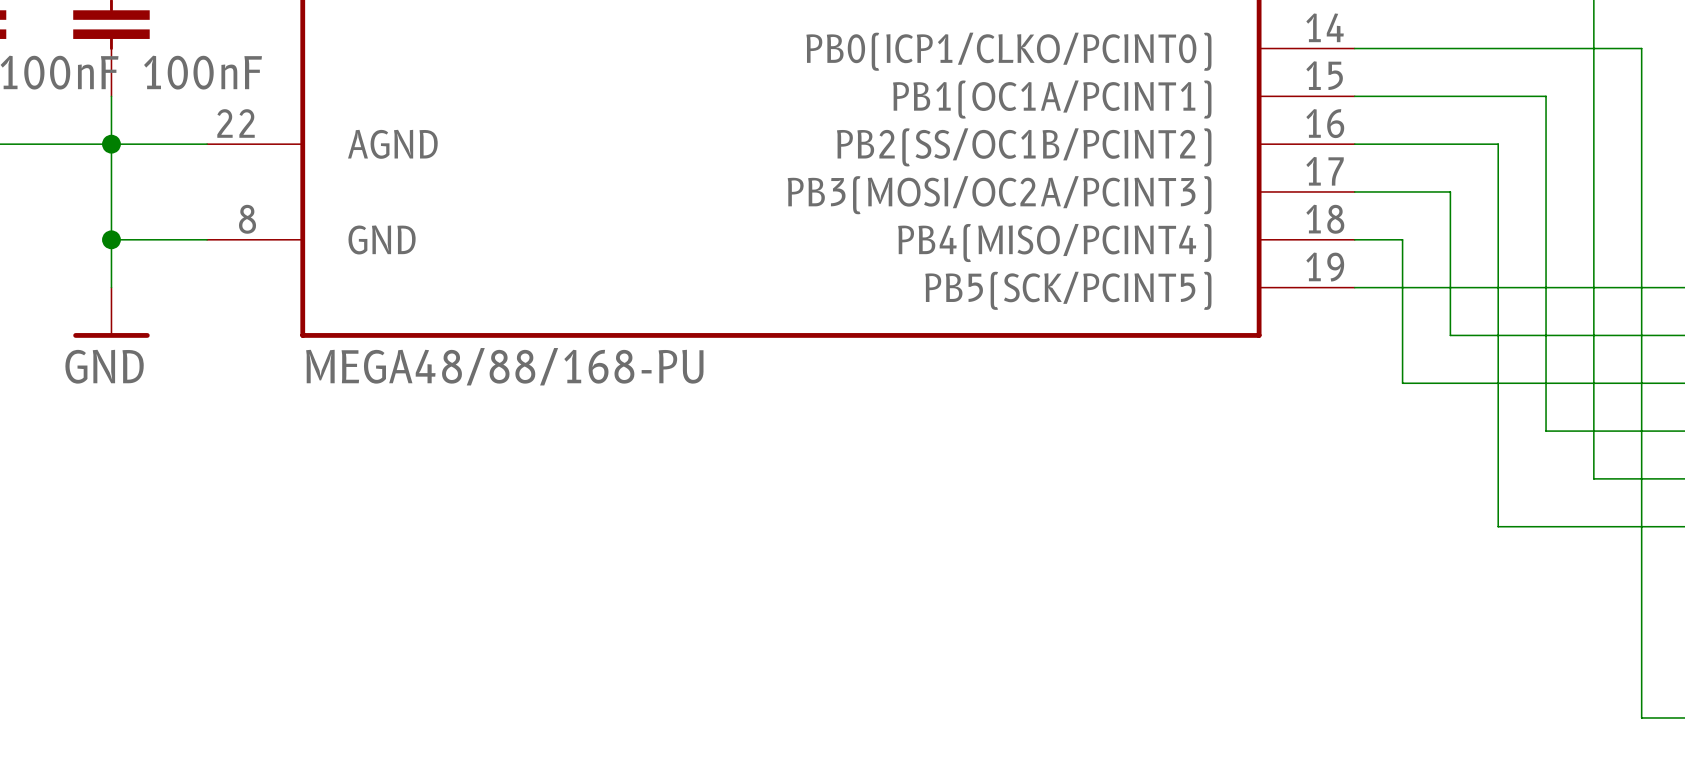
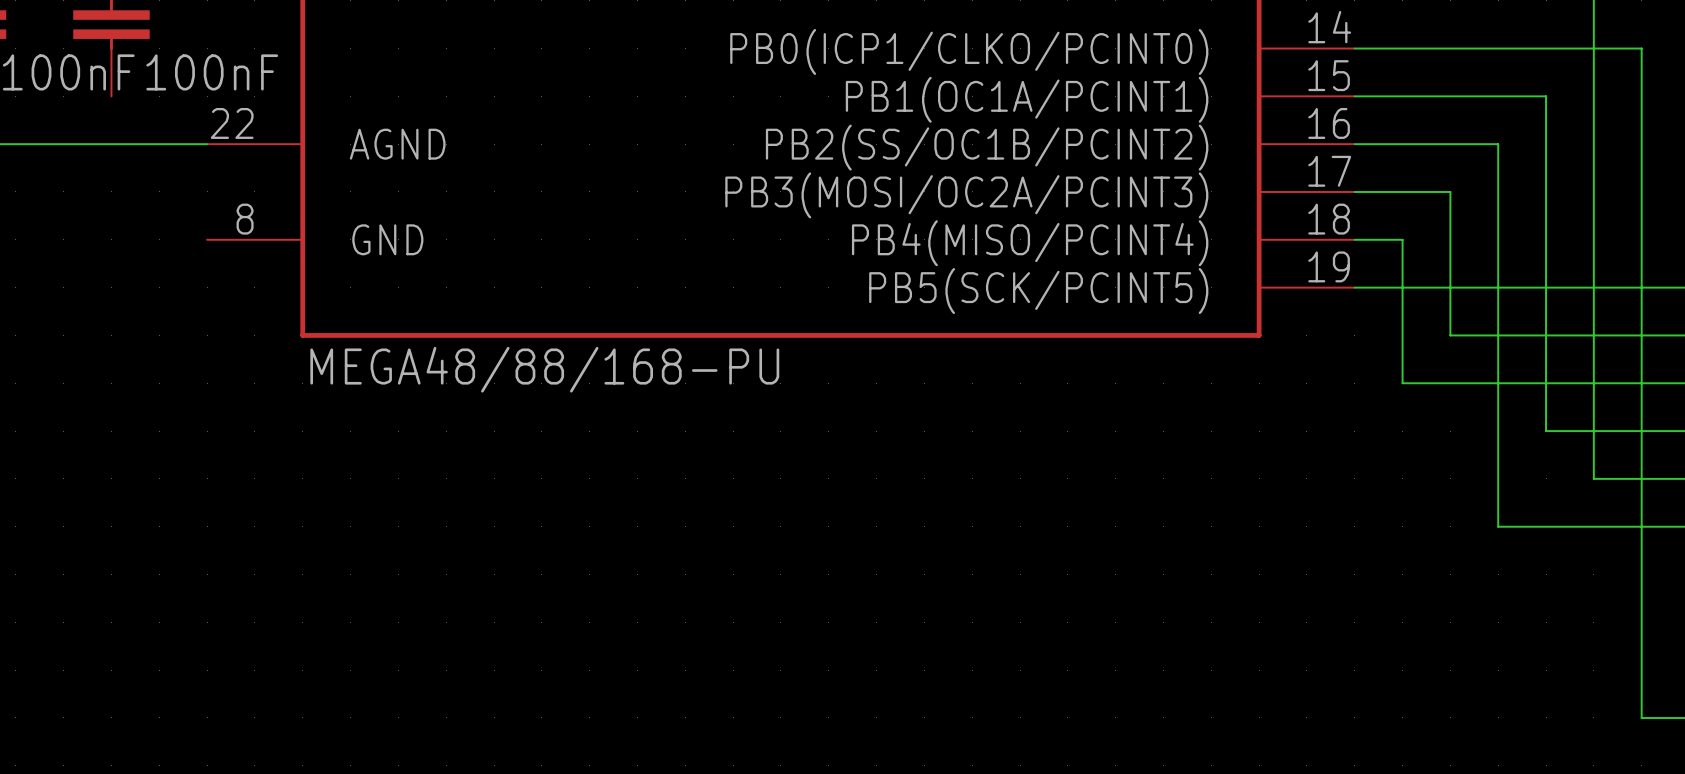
wire: (111, 96) (111, 287) -> none
junction: (111, 144) -> none
wire: (111, 239) (207, 239) -> none
junction: (111, 239) -> none
power symbol: GND (111, 312) -> none

